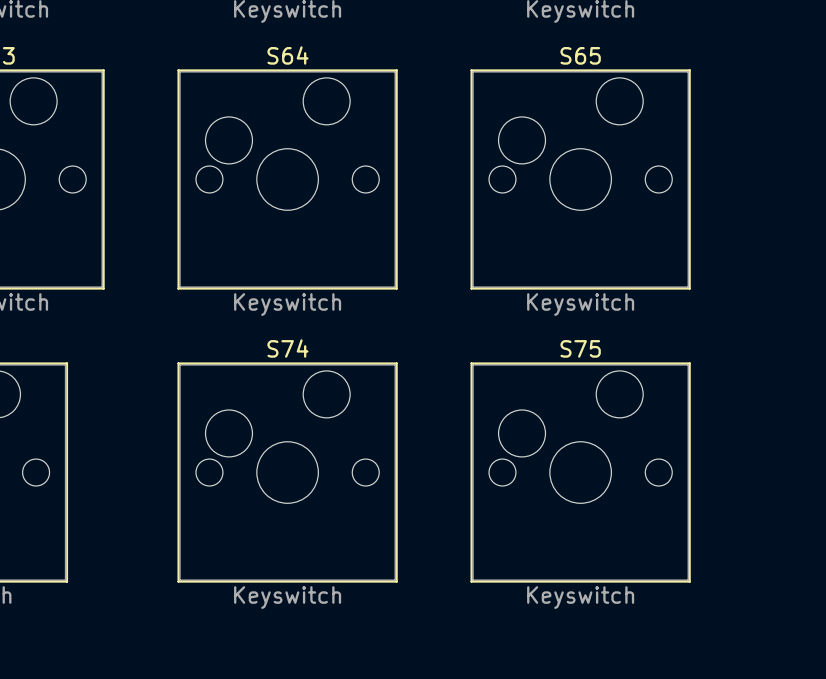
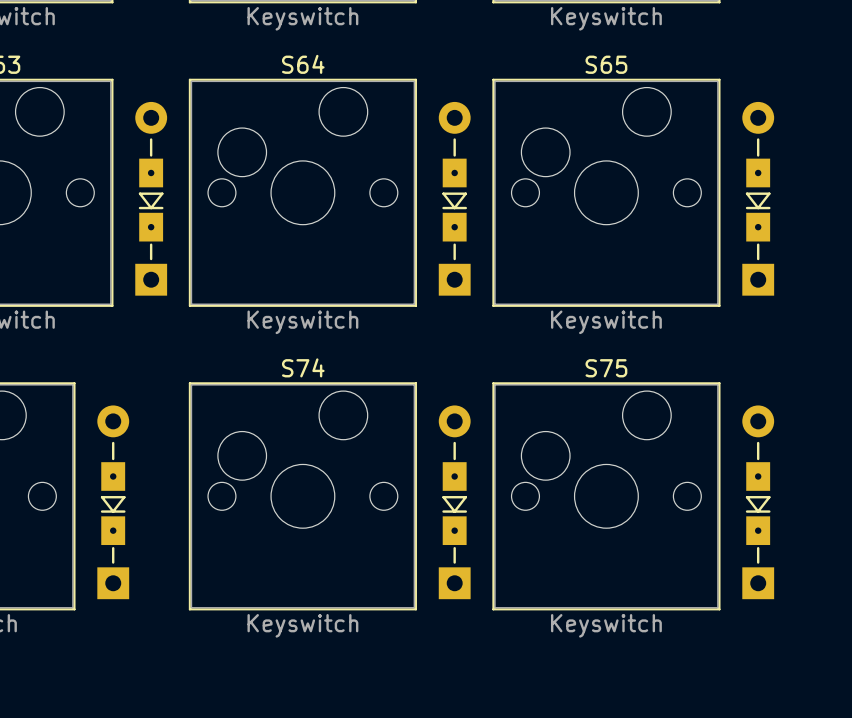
part: none -> (151, 198)
part: none -> (454, 198)
part: none -> (758, 198)
part: none -> (113, 502)
part: none -> (454, 502)
part: none -> (758, 502)

